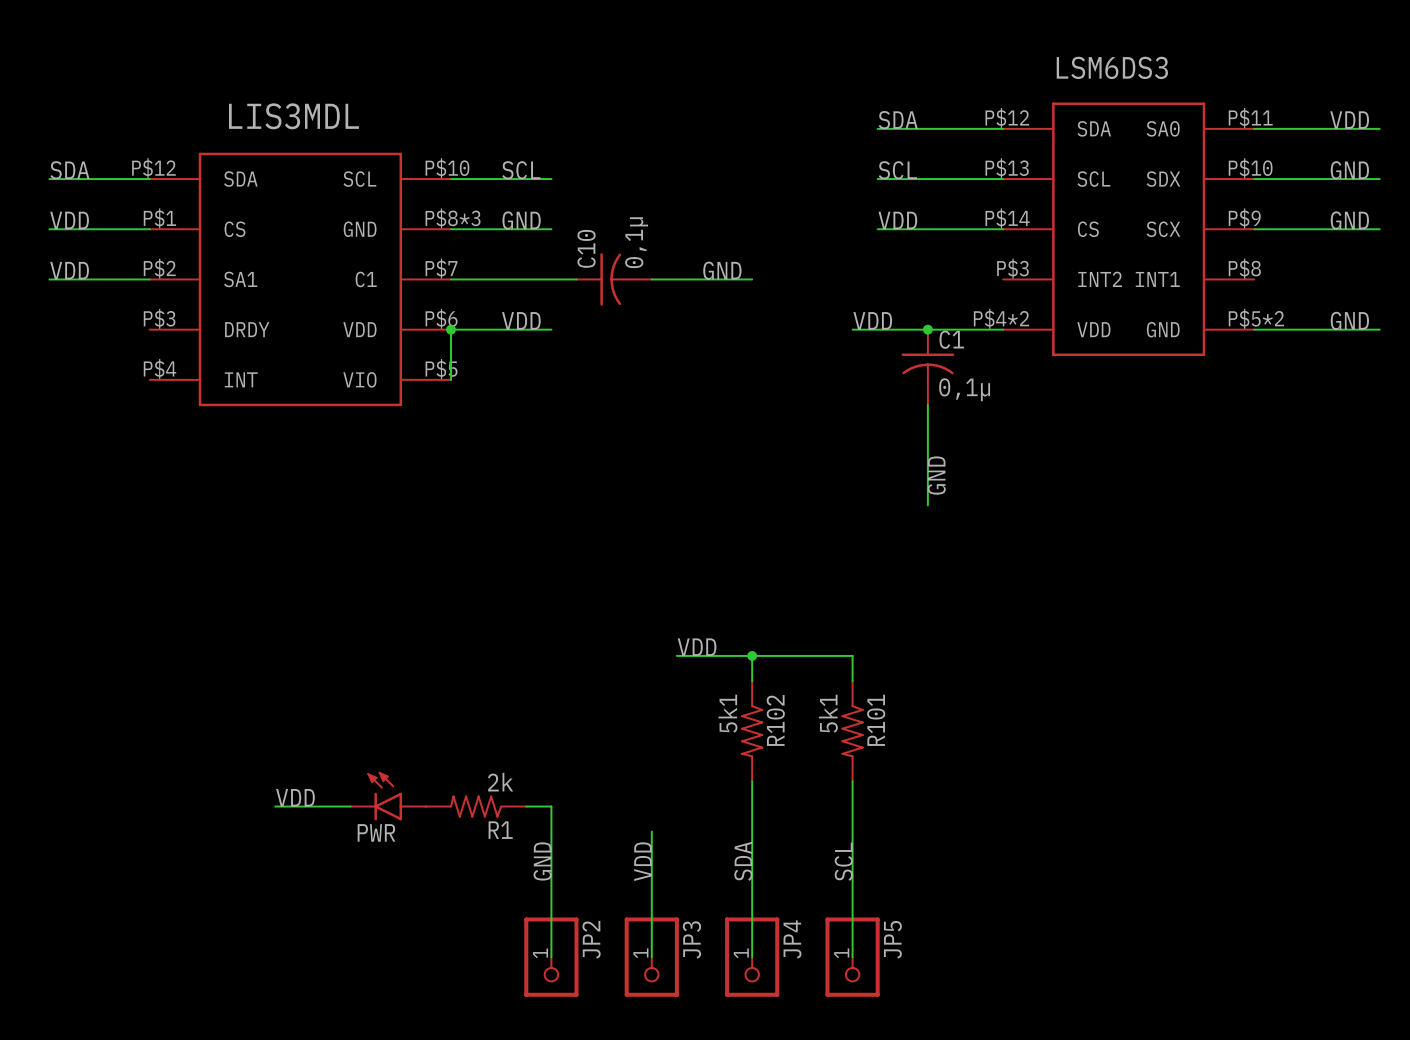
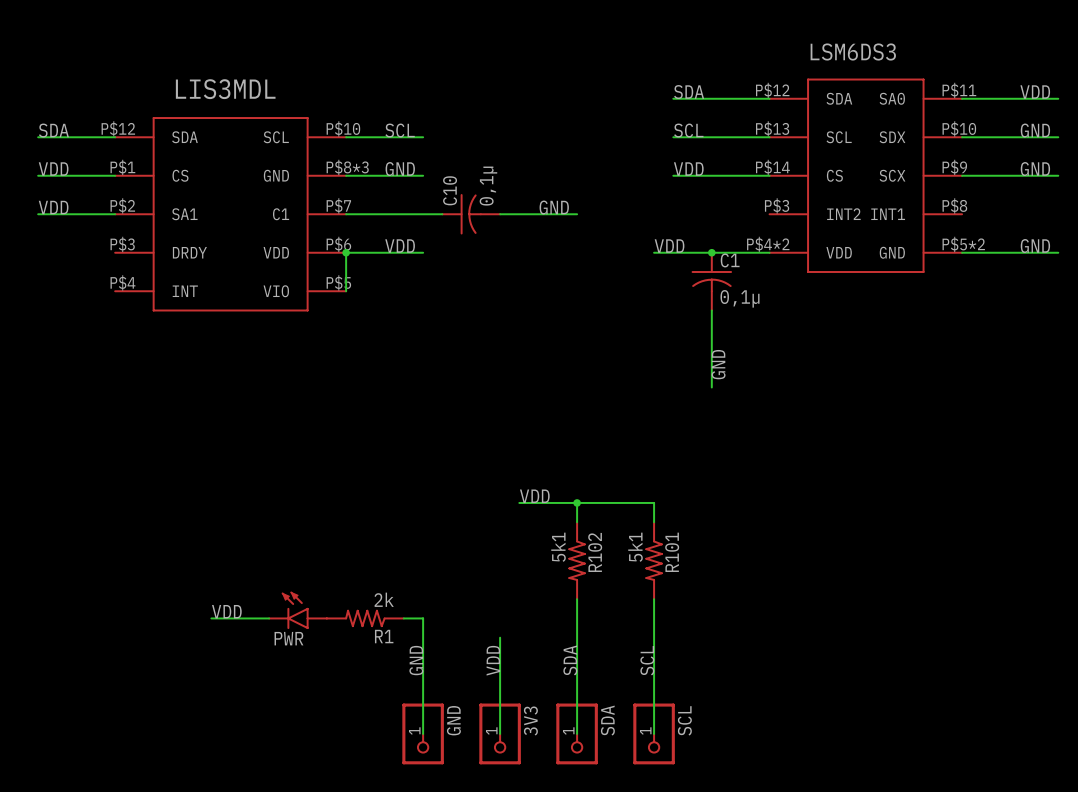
JP2 name: JP2 (591, 939) -> GND (453, 720)
JP3 name: JP3 (691, 939) -> 3V3 (530, 720)
JP4 name: JP4 (792, 939) -> SDA (607, 720)
JP5 name: JP5 (892, 939) -> SCL (684, 720)

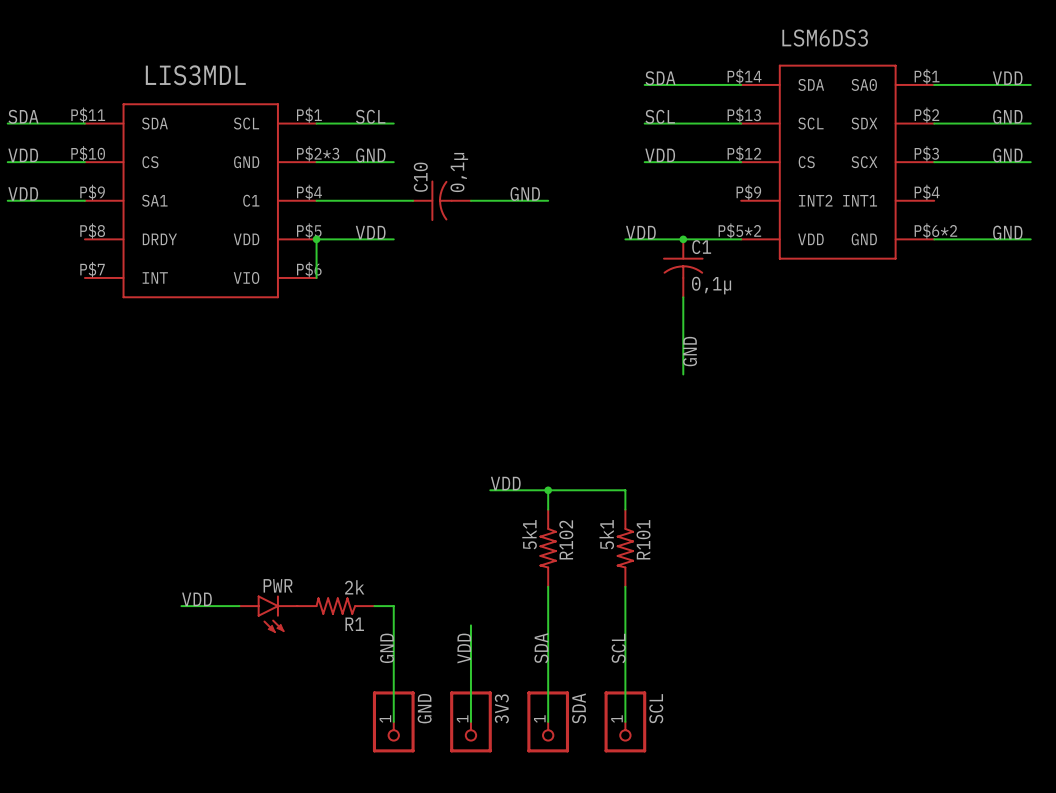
LSM6DS3 symbol: [769, 78, 963, 273] -> [741, 64, 935, 260]
LIS3MDL symbol: [115, 117, 347, 312] -> [84, 103, 317, 299]
PWR rotation: 0° (295, 610) -> 180° (271, 614)

